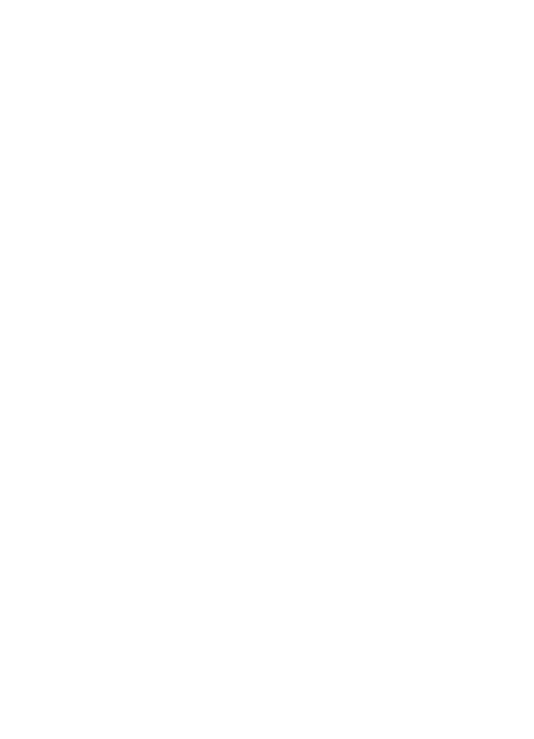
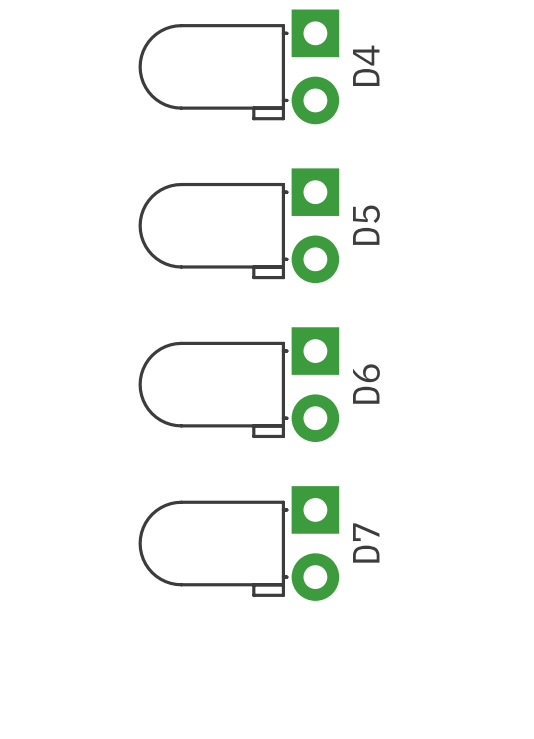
D4: none -> (238, 66)
D5: none -> (238, 225)
D6: none -> (238, 384)
D7: none -> (238, 543)

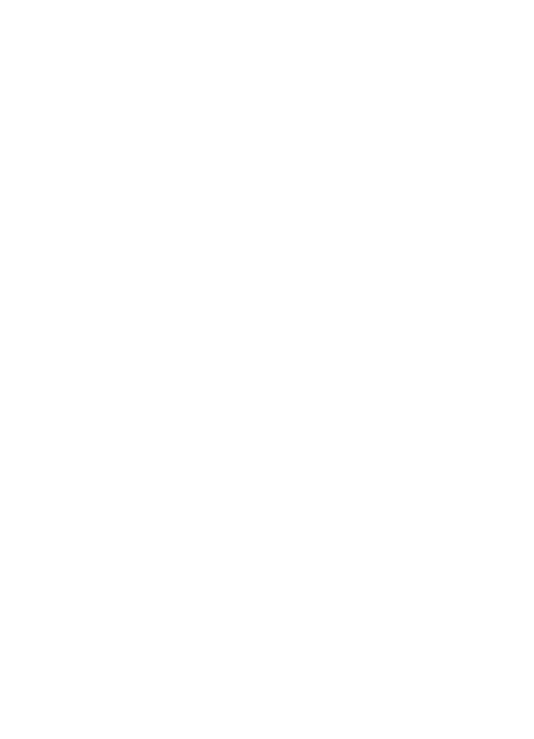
D4: (238, 66) -> none
D5: (238, 225) -> none
D6: (238, 384) -> none
D7: (238, 543) -> none

